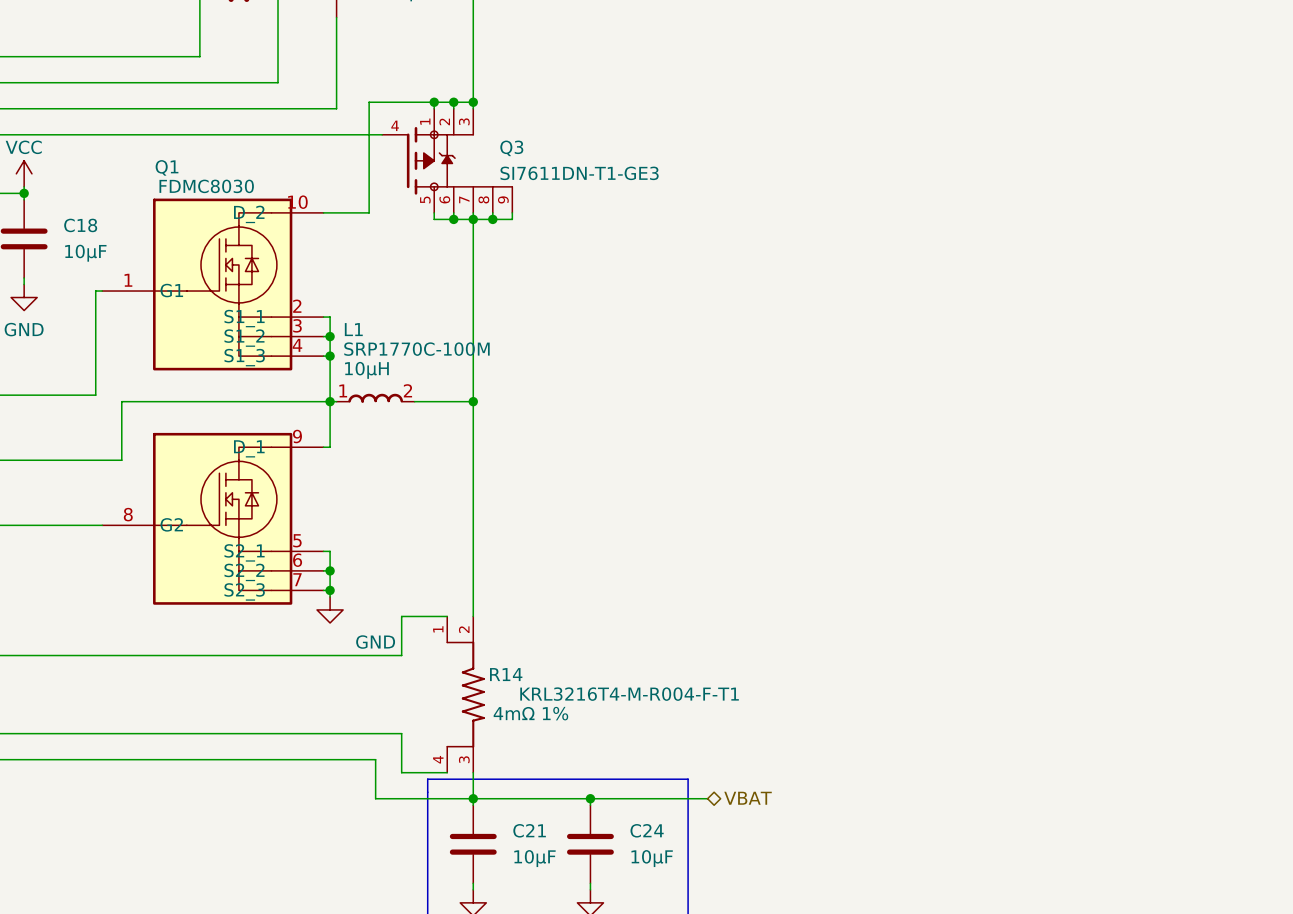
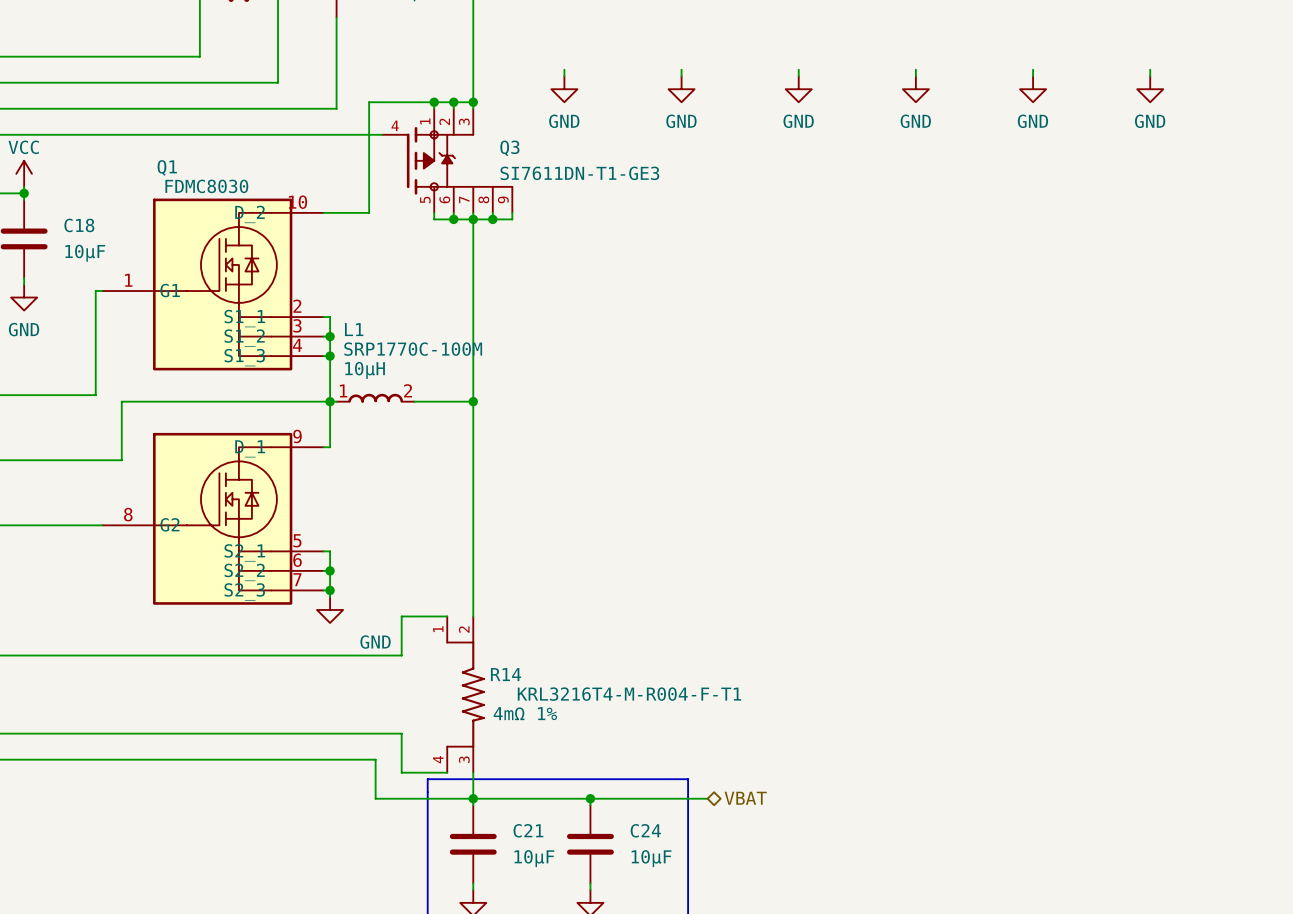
wire: none -> (564, 69) (564, 76)
wire: none -> (681, 69) (681, 76)
wire: none -> (798, 69) (798, 76)
wire: none -> (915, 69) (915, 76)
wire: none -> (1033, 69) (1033, 76)
wire: none -> (1150, 69) (1150, 76)
power symbol: none -> GND (564, 89)
power symbol: none -> GND (681, 89)
power symbol: none -> GND (798, 89)
power symbol: none -> GND (915, 89)
power symbol: none -> GND (1033, 89)
power symbol: none -> GND (1150, 89)

